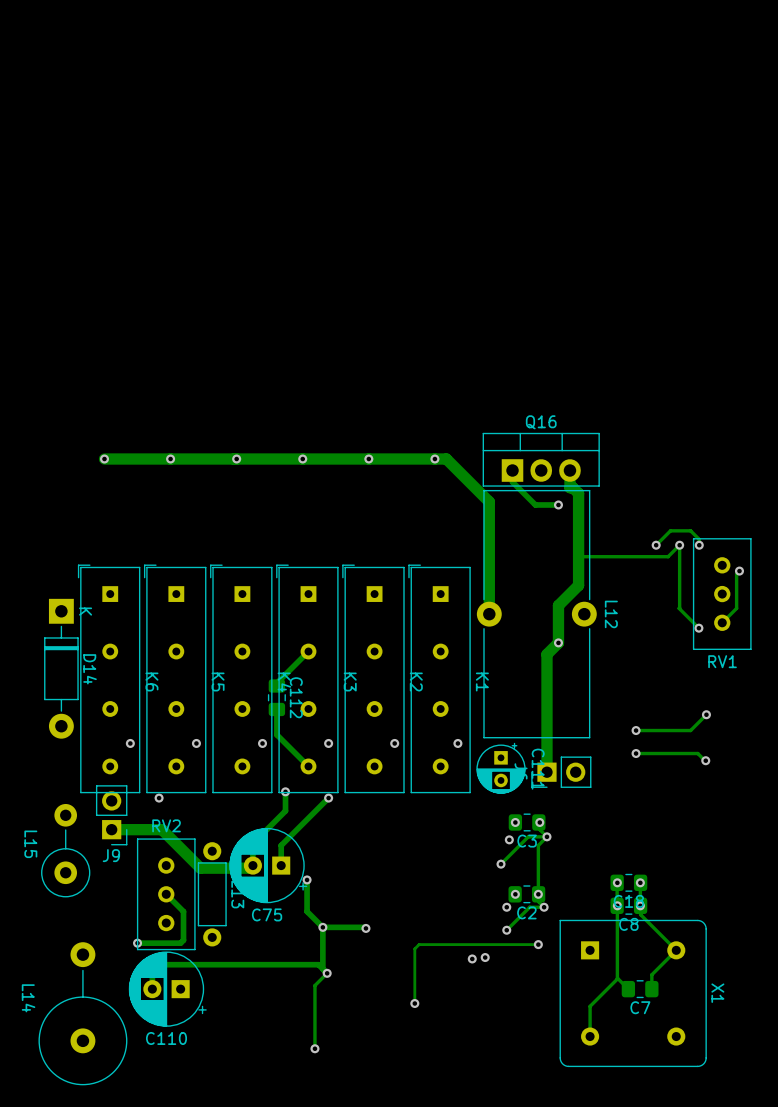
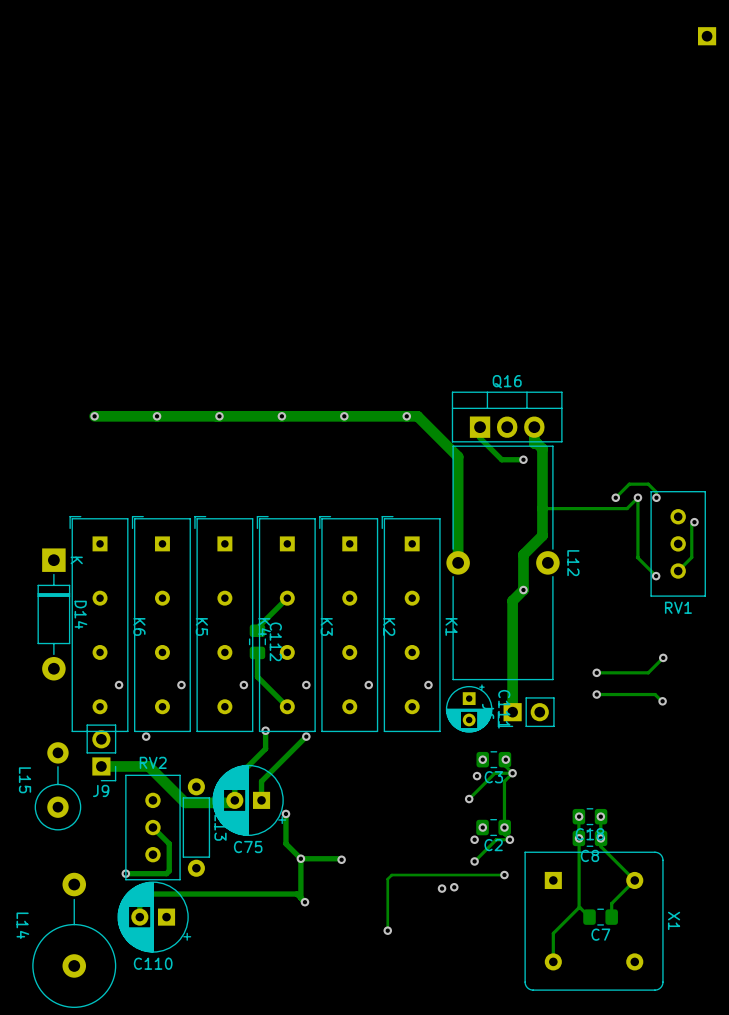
part: none -> (707, 36)
track: (327, 973) (314, 985) (314, 1048) -> none
via: (314, 1048) -> none

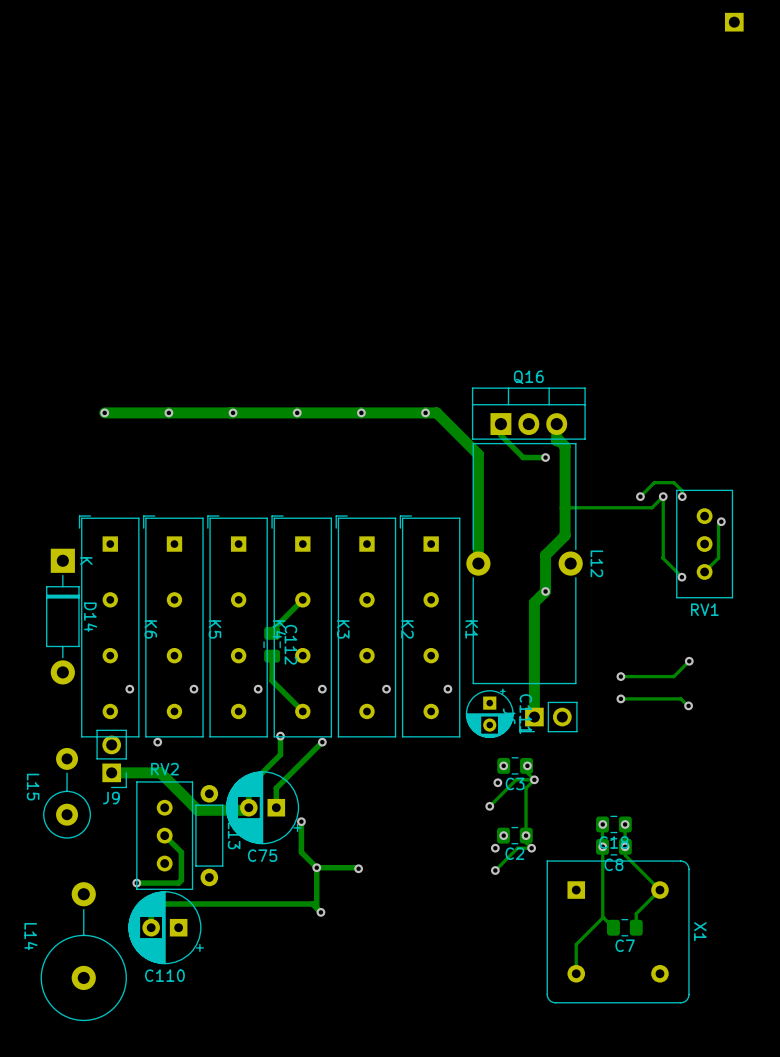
track: (504, 875) (391, 875) (387, 879) (387, 930) -> none
via: (504, 875) -> none
via: (454, 887) -> none
via: (442, 888) -> none
via: (387, 930) -> none

